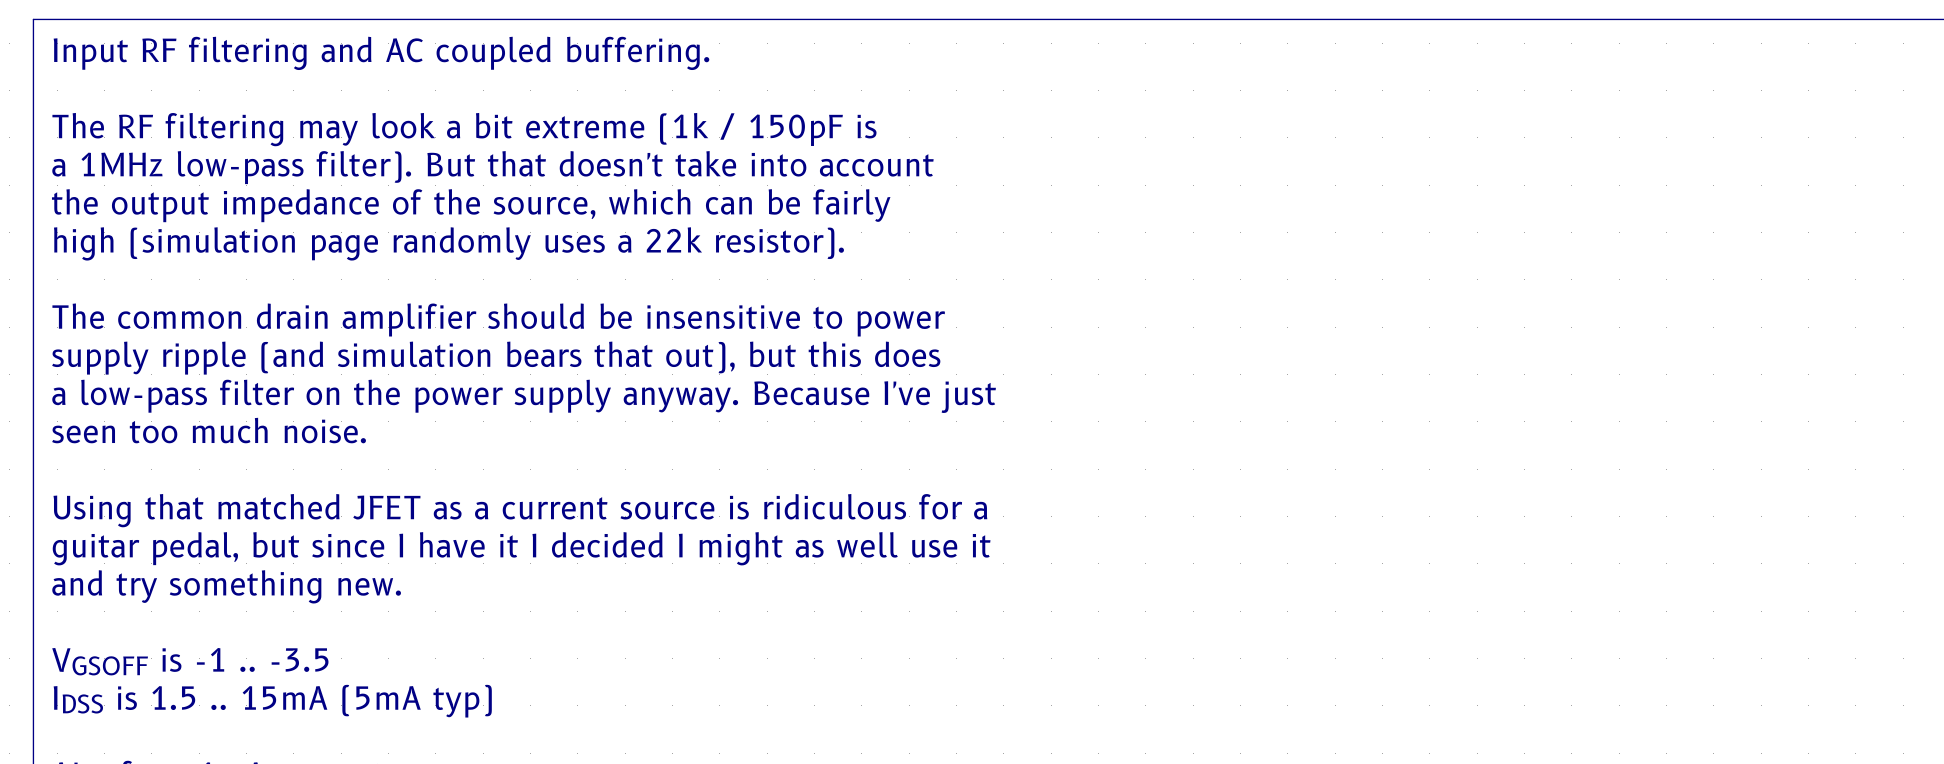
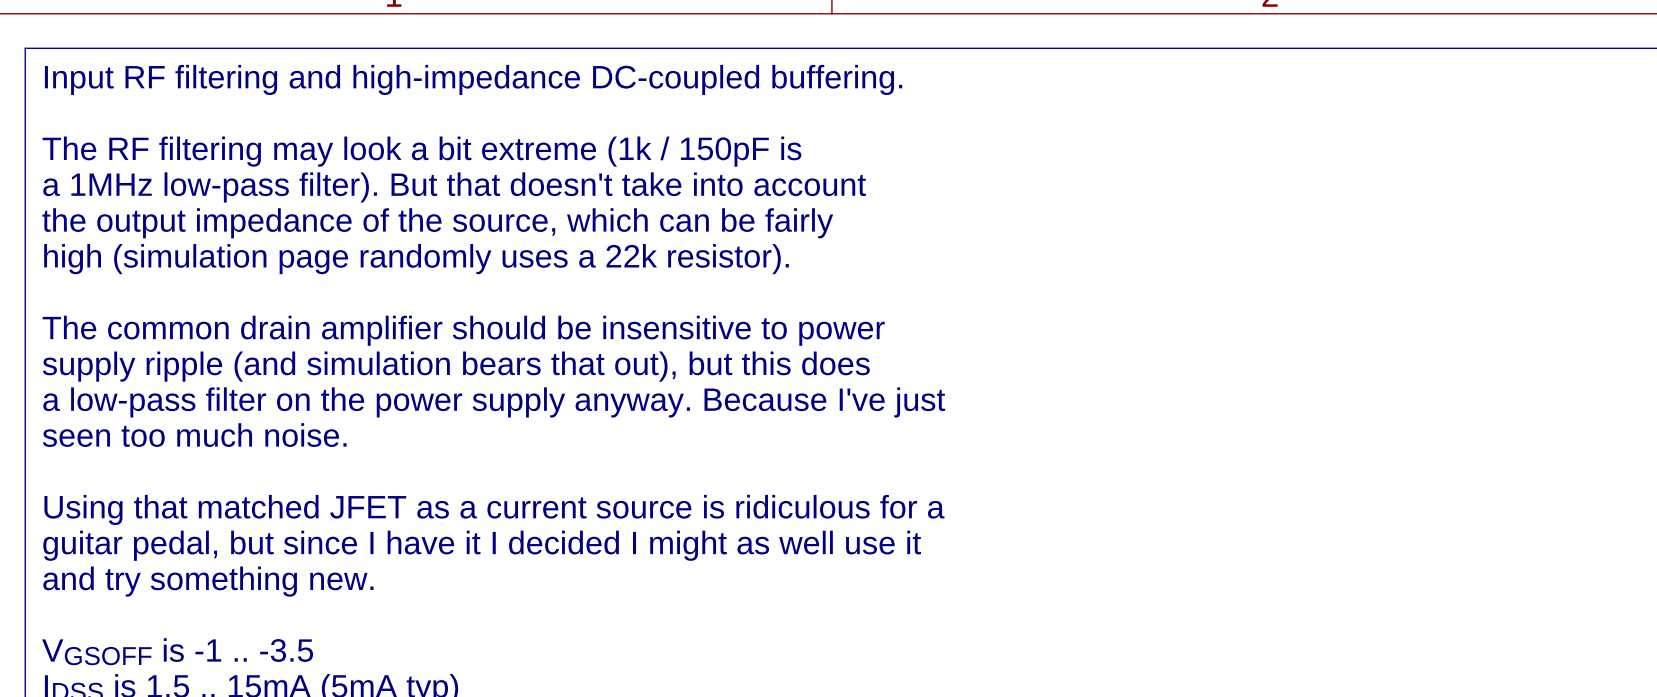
text: Input RF filtering and AC coupled buffering. (381, 53) -> Input RF filtering and high-impedance DC-coupled buffering. (473, 79)

